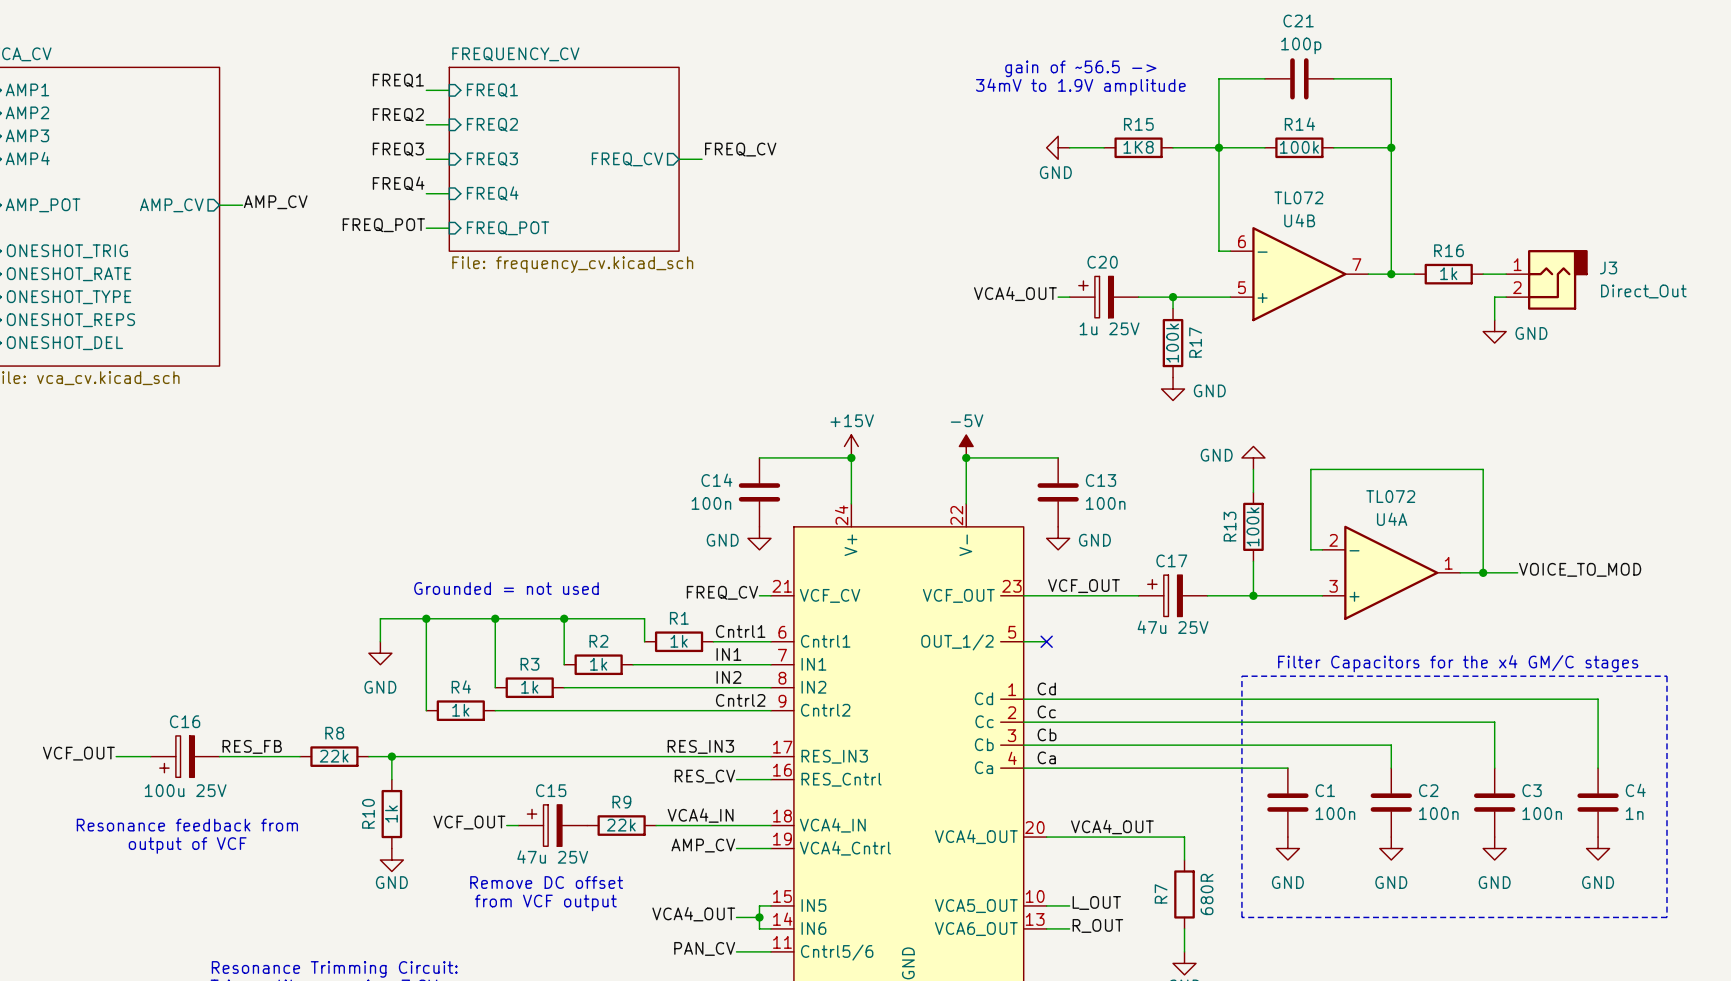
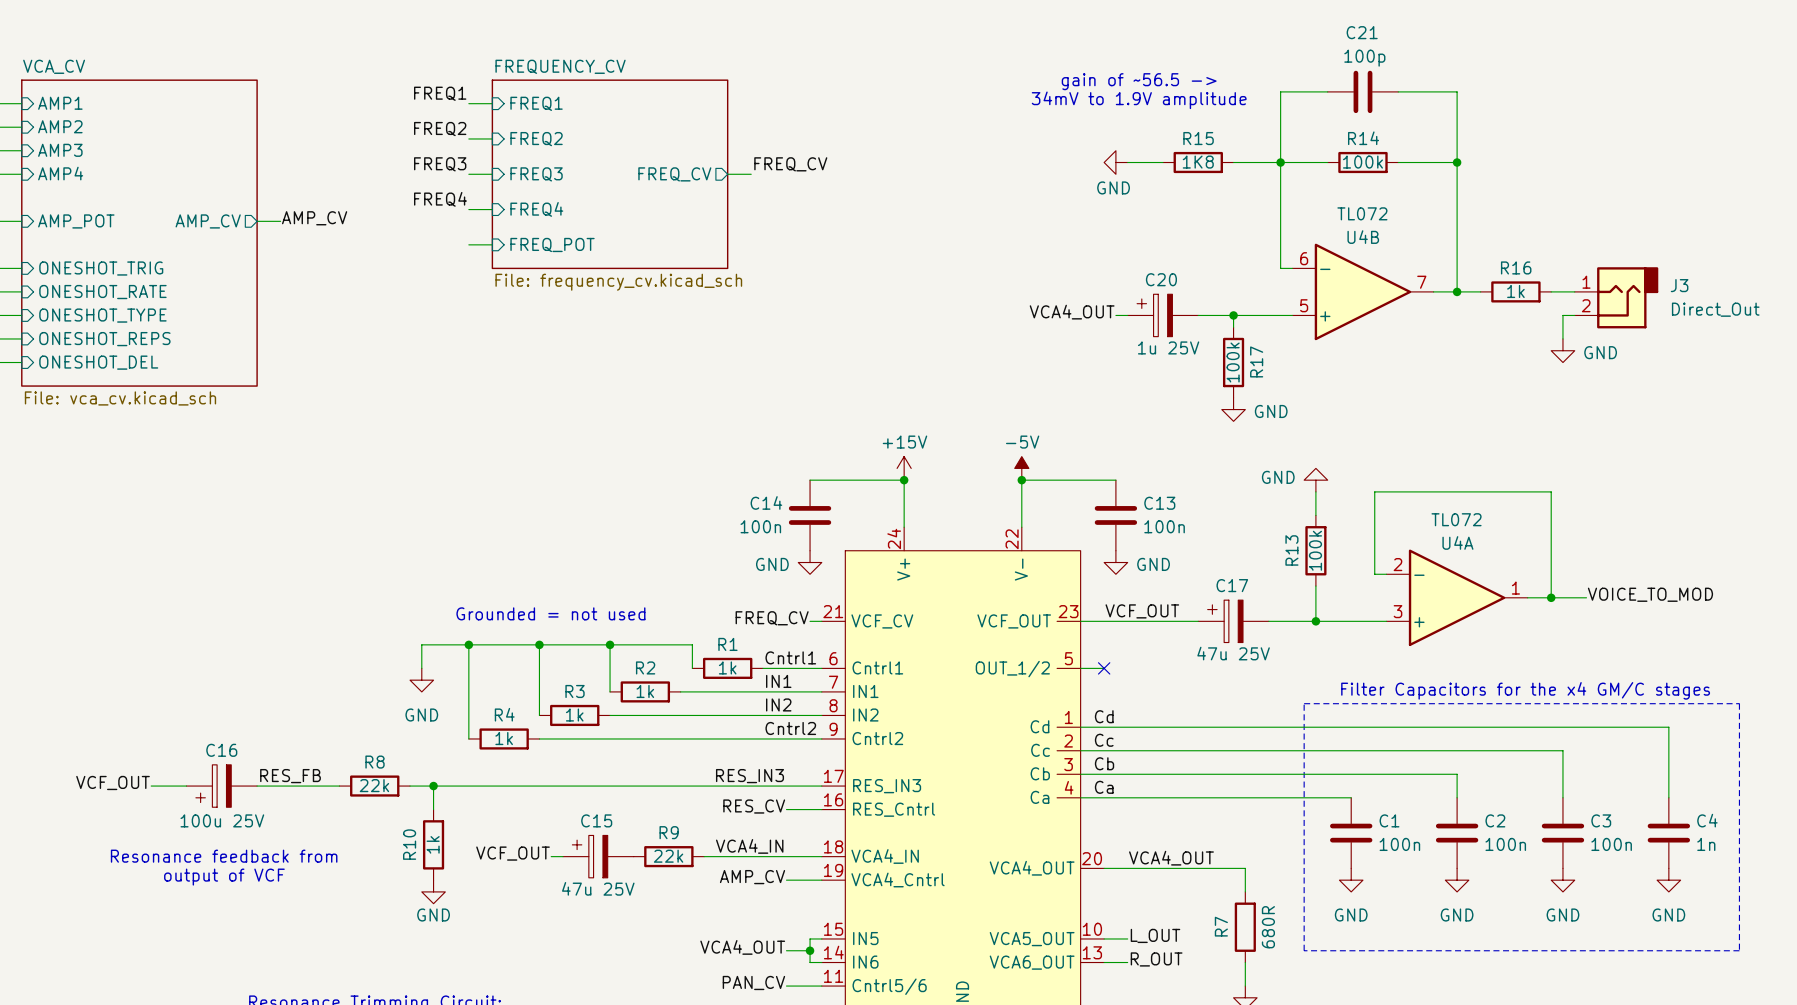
label: FREQ_POT (383, 225) -> none
text: Remove DC offset (546, 882) -> none
text: from VCF output (545, 902) -> none

